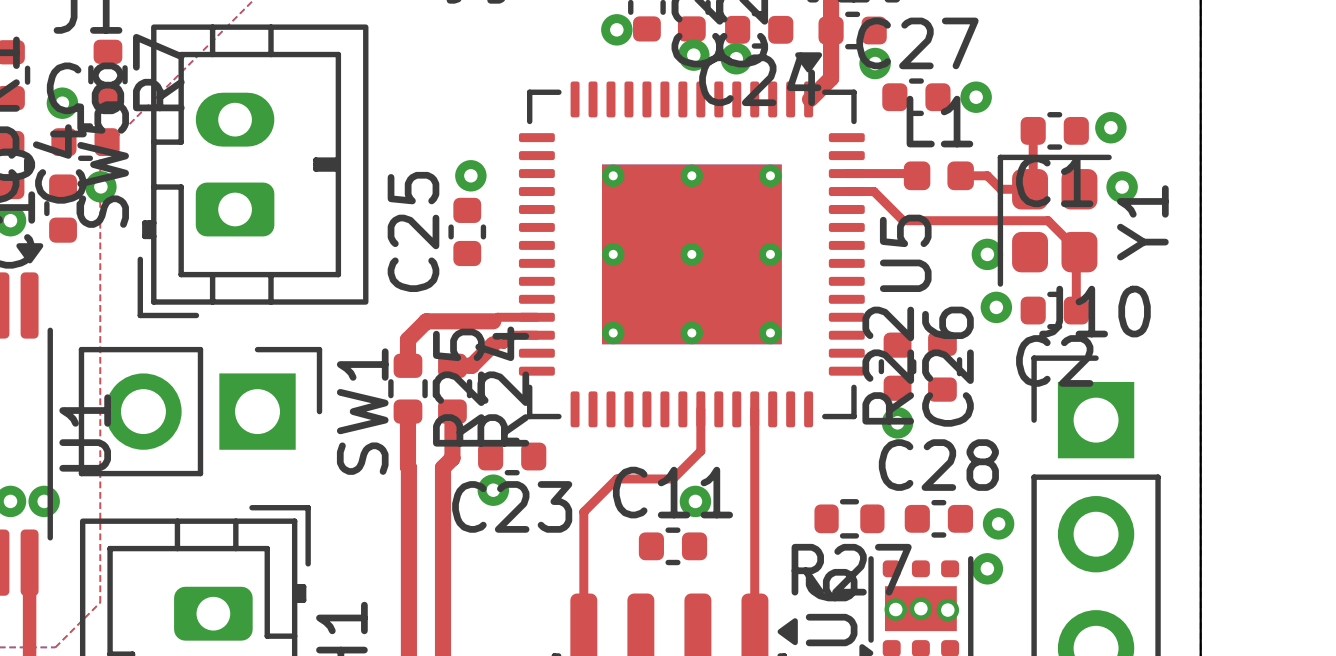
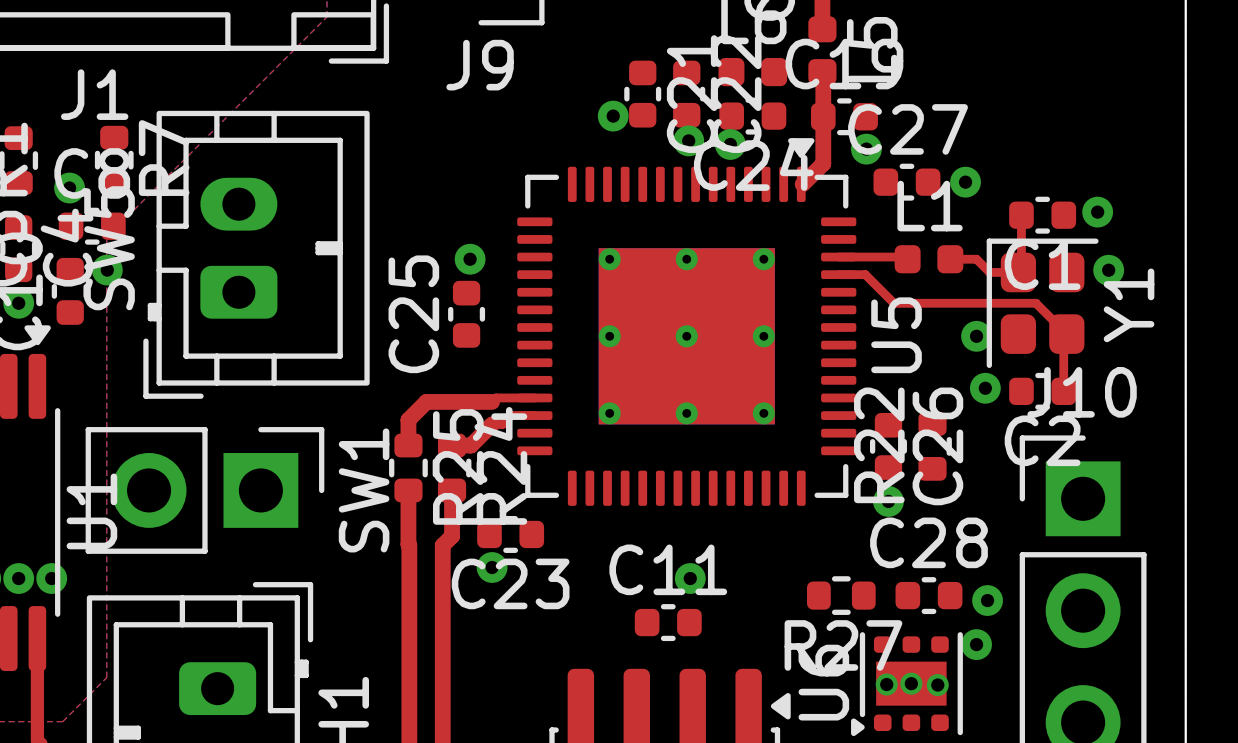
top track: (700, 409) (700, 451) (672, 478) (616, 478) (583, 511) (583, 637) -> none
top track: (754, 409) (754, 637) -> none

